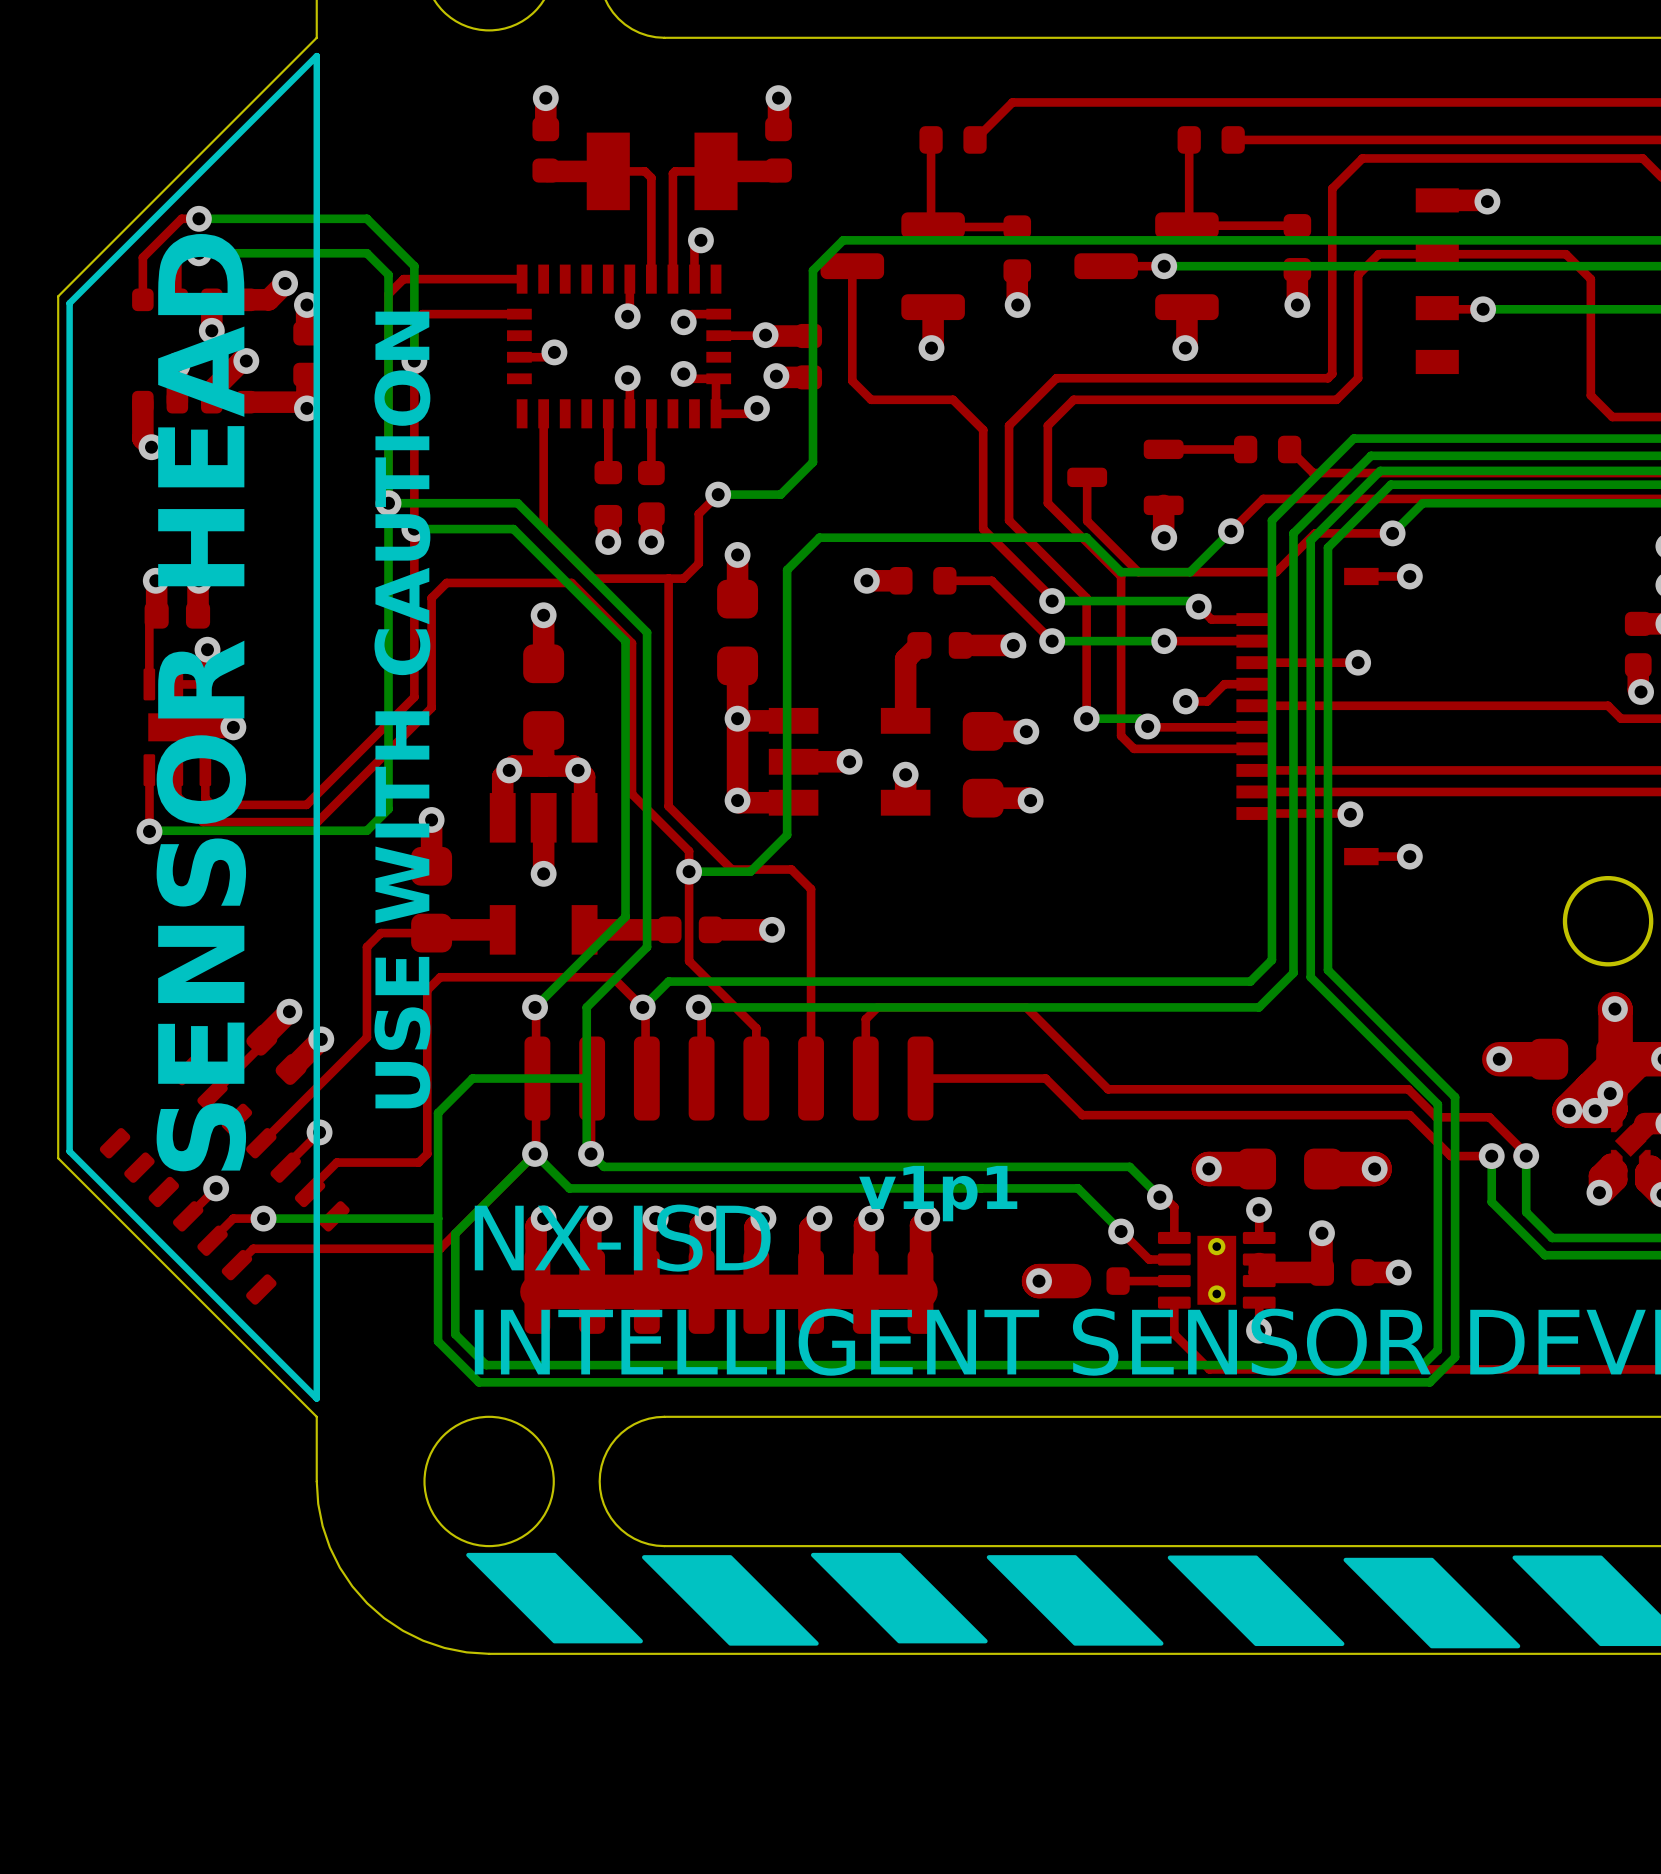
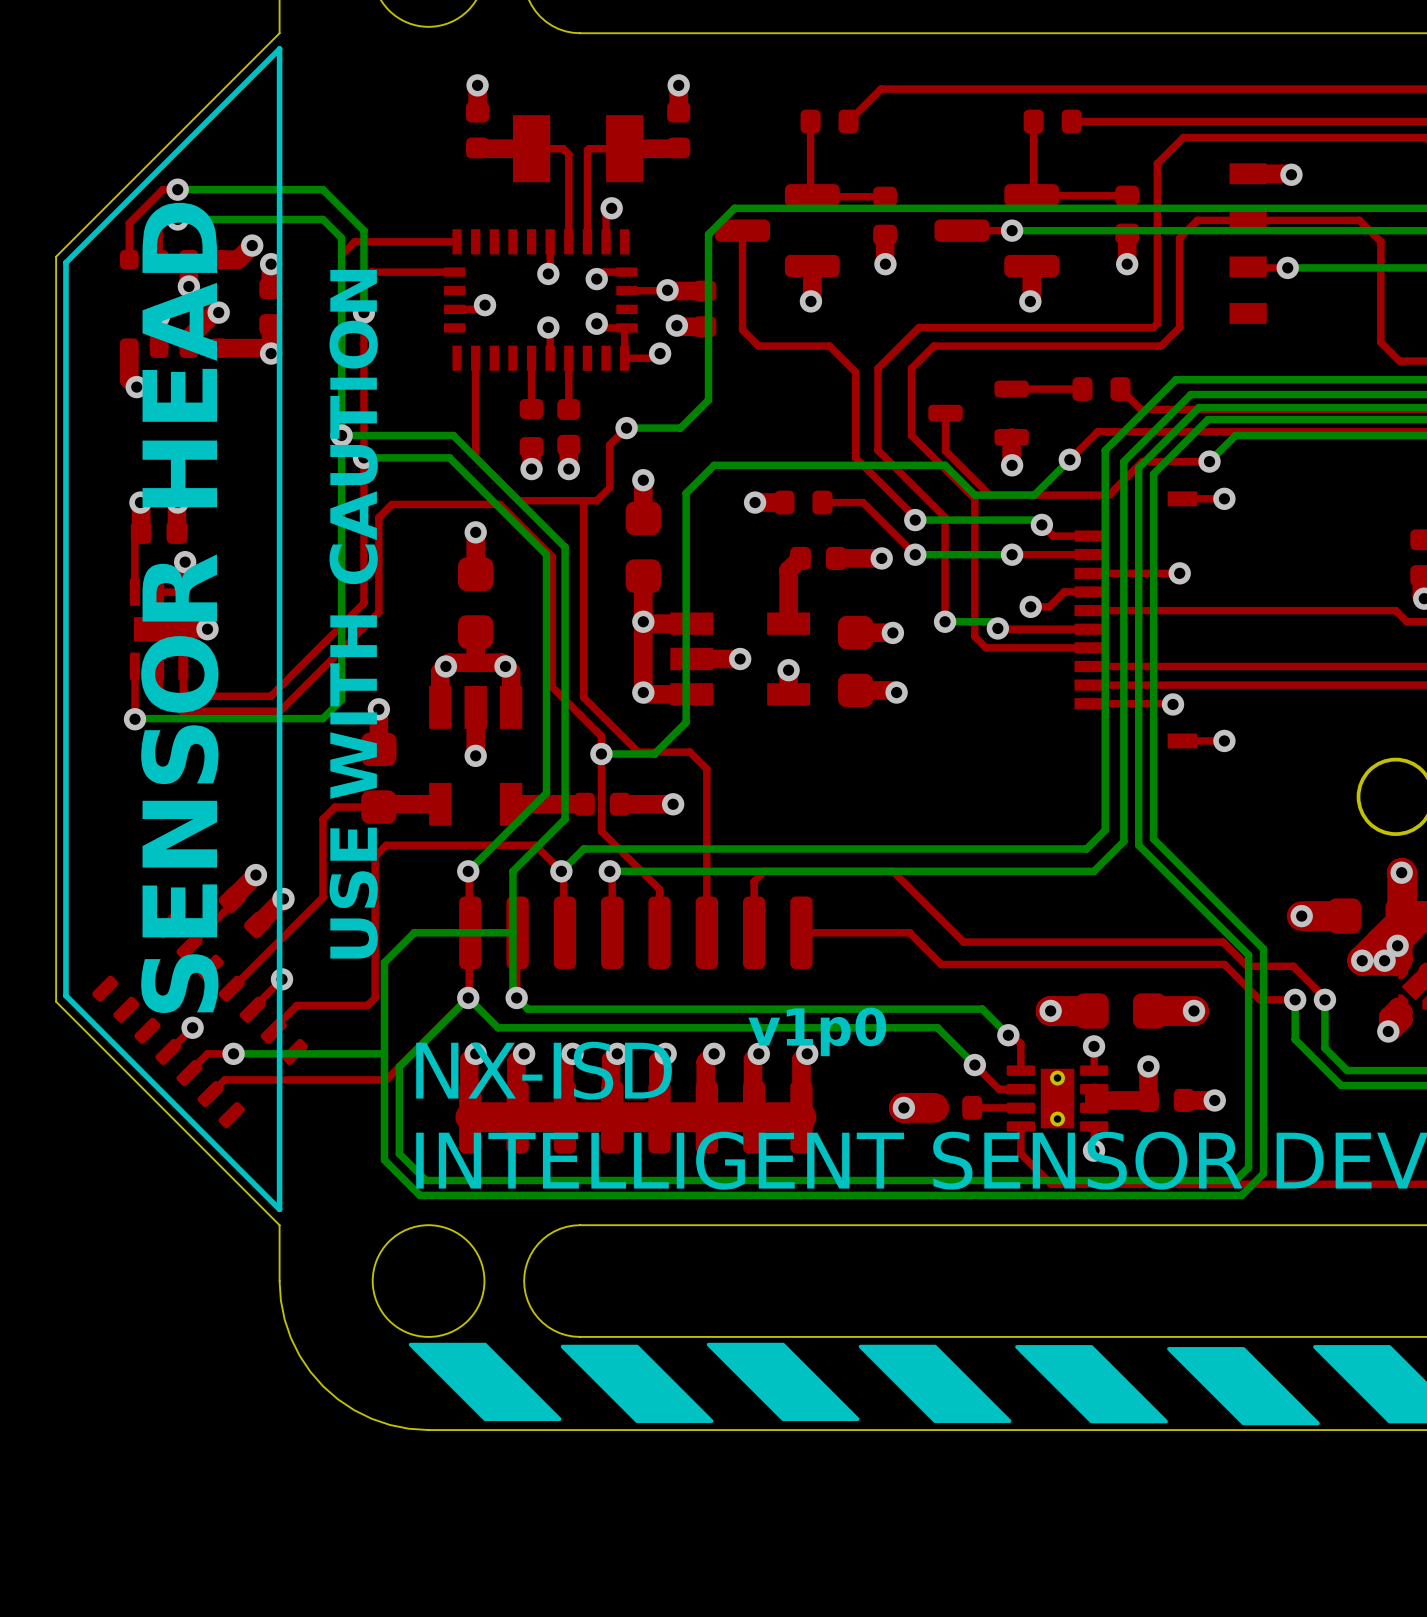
text: v1p1 (938, 1193) -> v1p0 (817, 1031)

